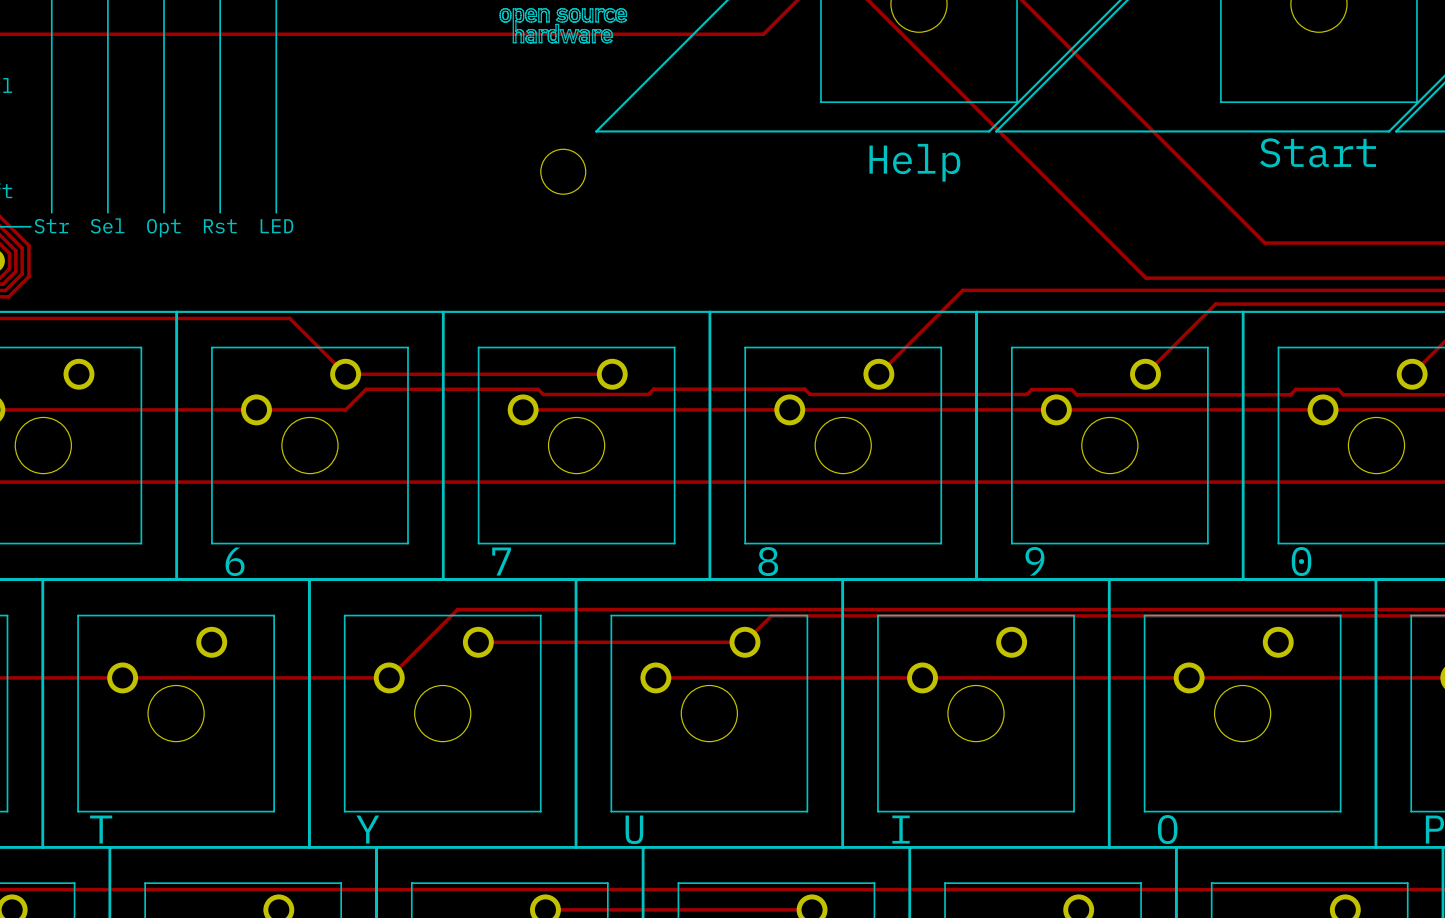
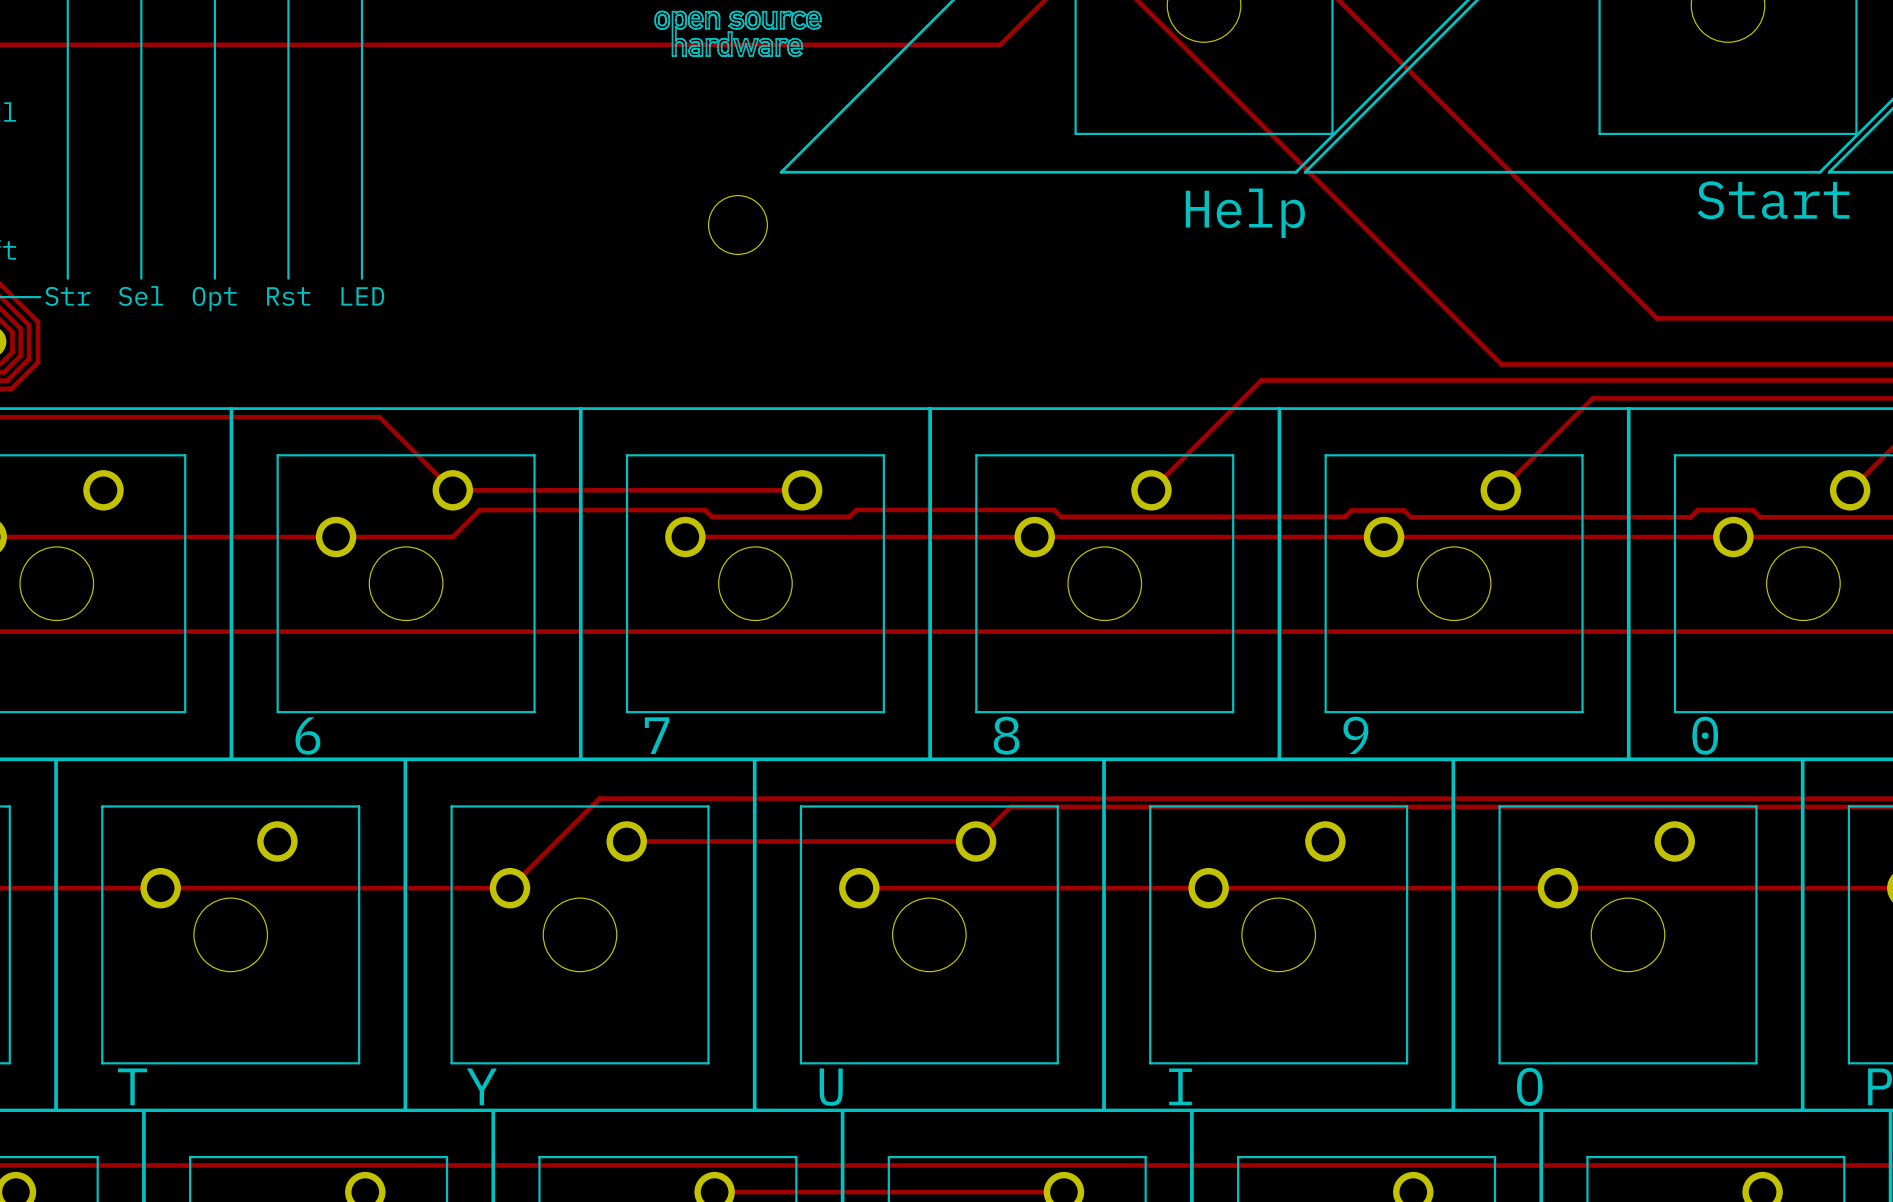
text position: Start (1318, 152) -> Start (1773, 200)
text position: Help (914, 162) -> Help (1245, 213)

